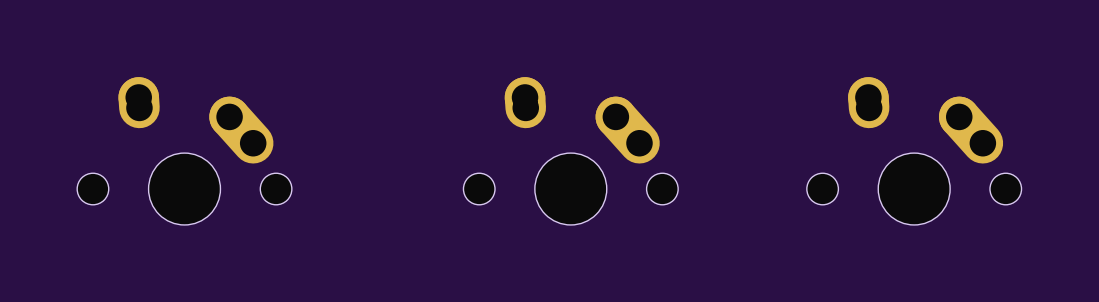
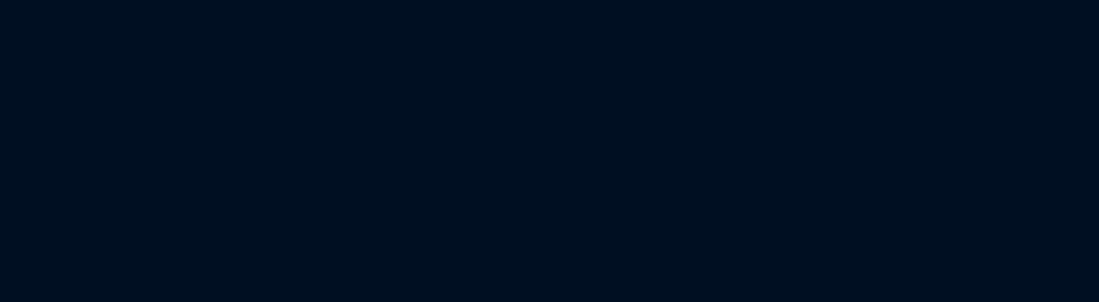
part: (184, 151) -> none
part: (570, 151) -> none
part: (914, 151) -> none

